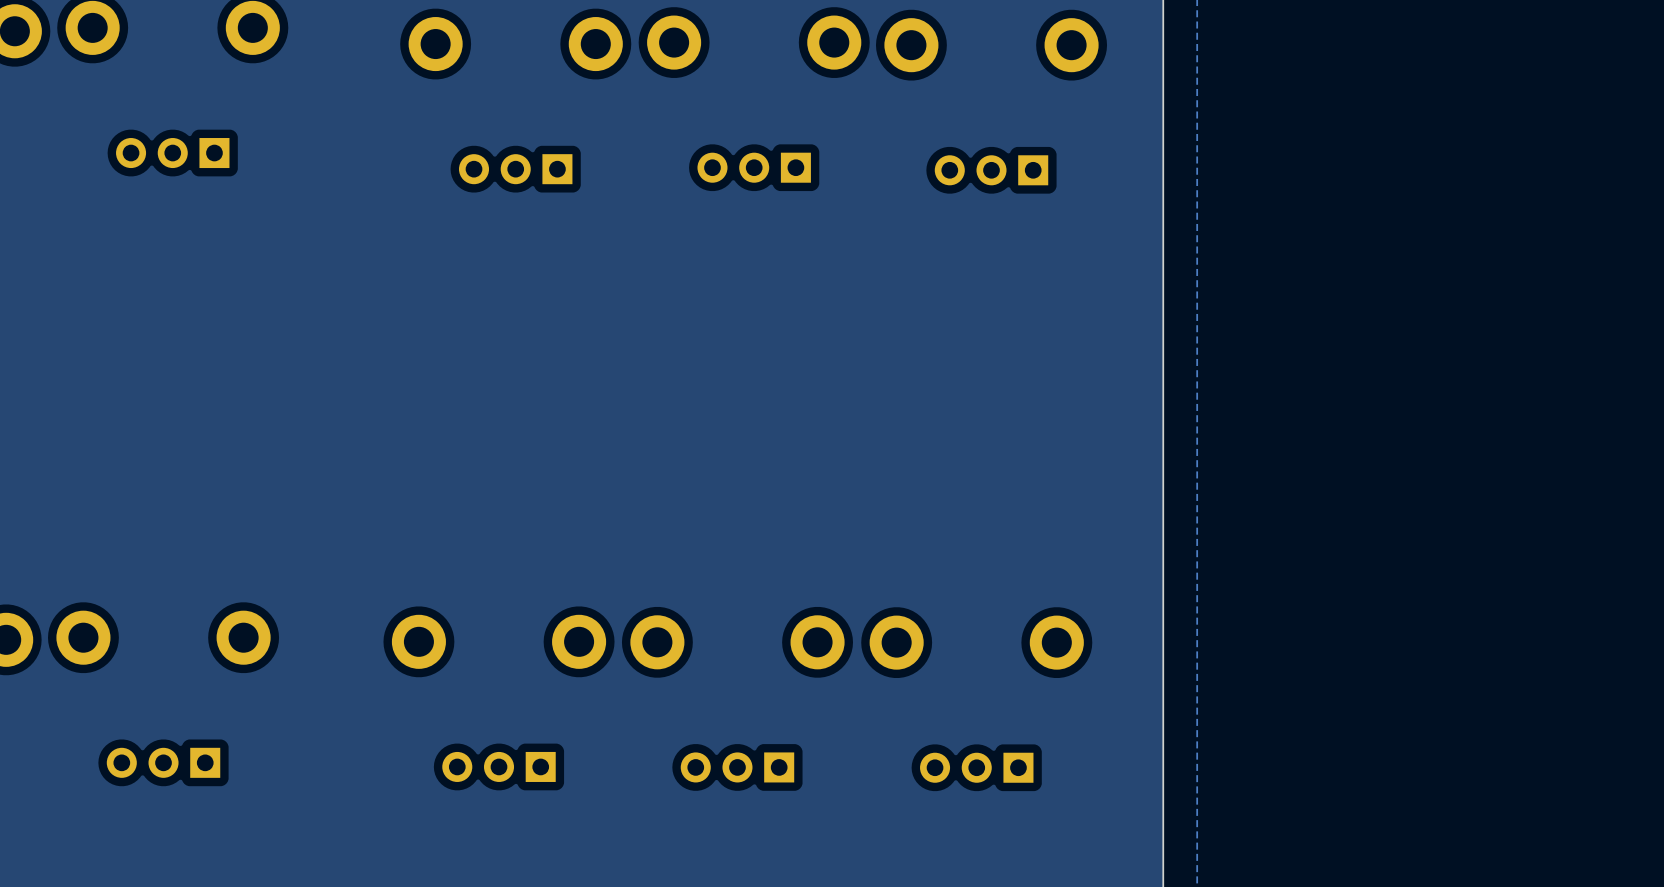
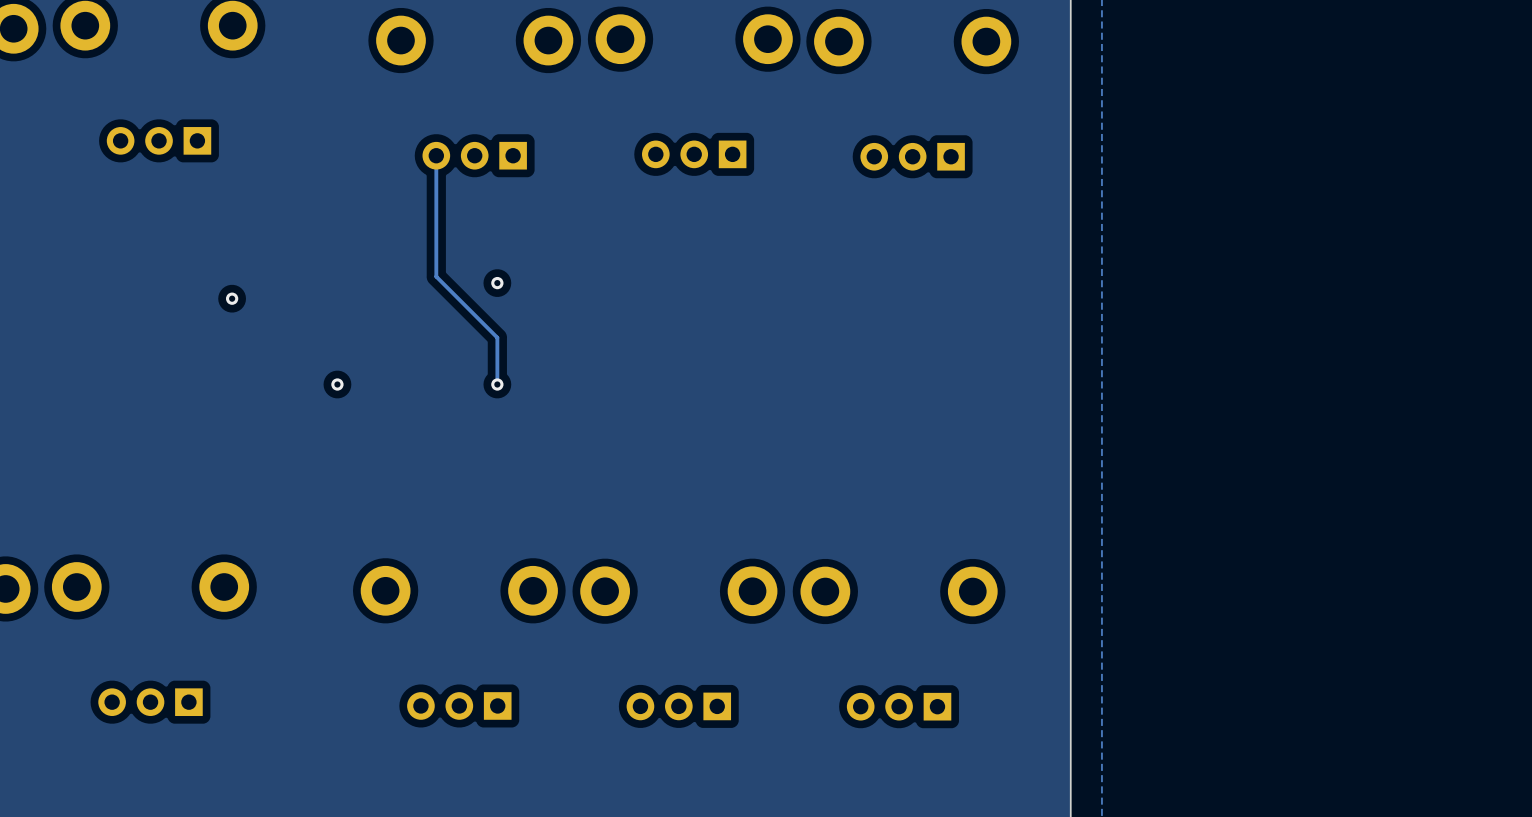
track: none -> (436, 155) (436, 276) (497, 337) (497, 384)
via: none -> (497, 283)
via: none -> (232, 298)
via: none -> (337, 384)
via: none -> (497, 384)

